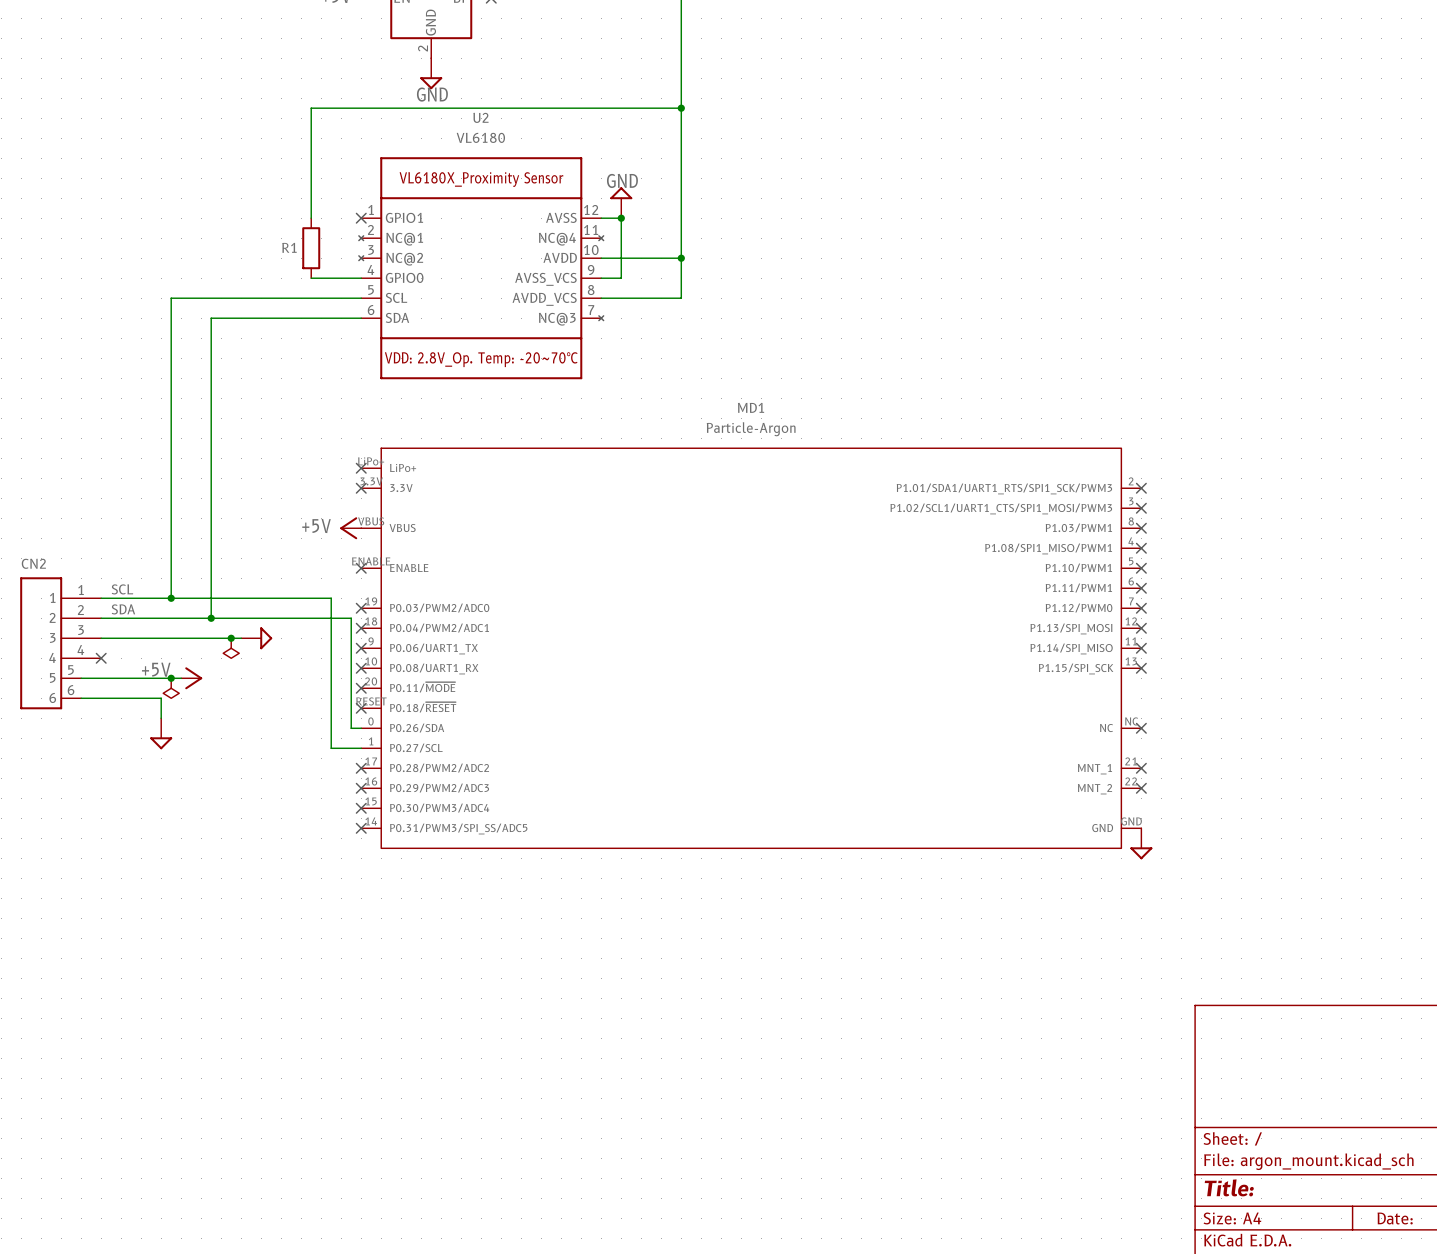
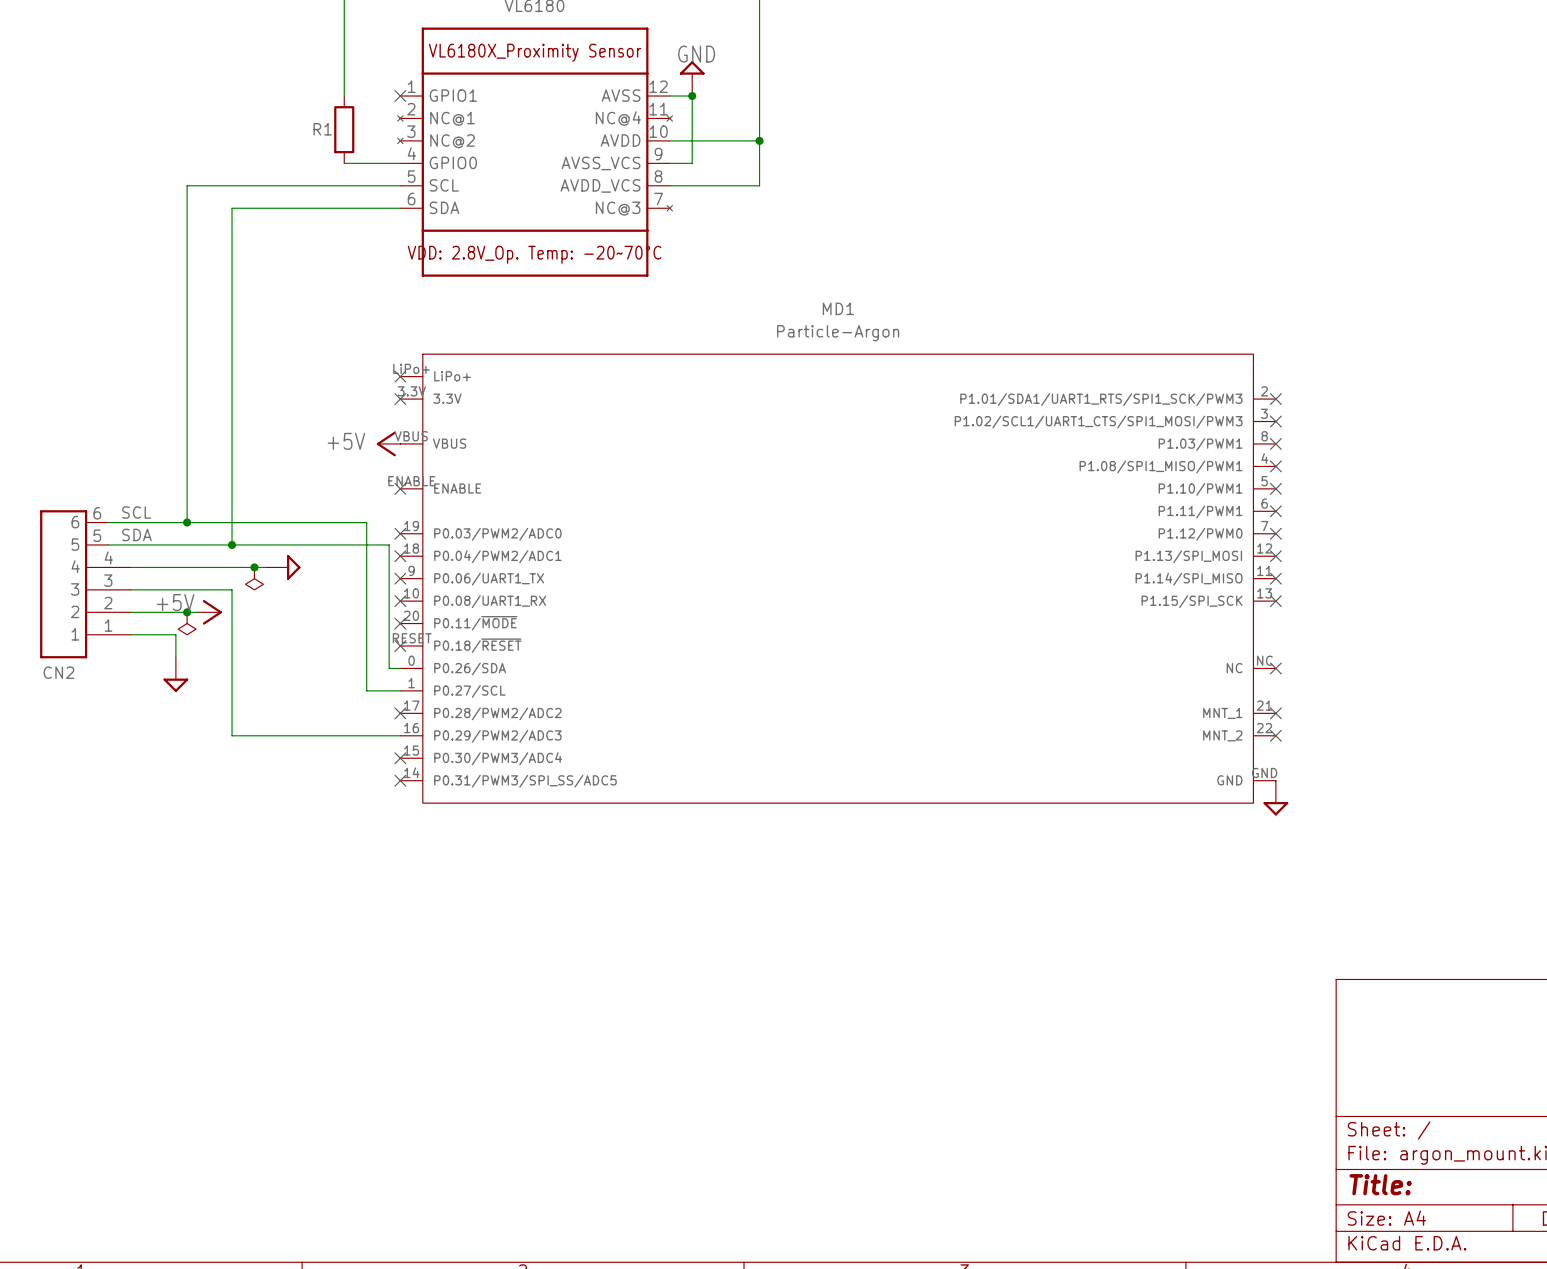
CN2 flip: as is (41, 643) -> up-down (63, 584)
no-connect mark: (101, 658) -> none
wire: none -> (130, 589) (232, 589) (232, 735) (400, 735)
no-connect mark: (361, 788) -> none

